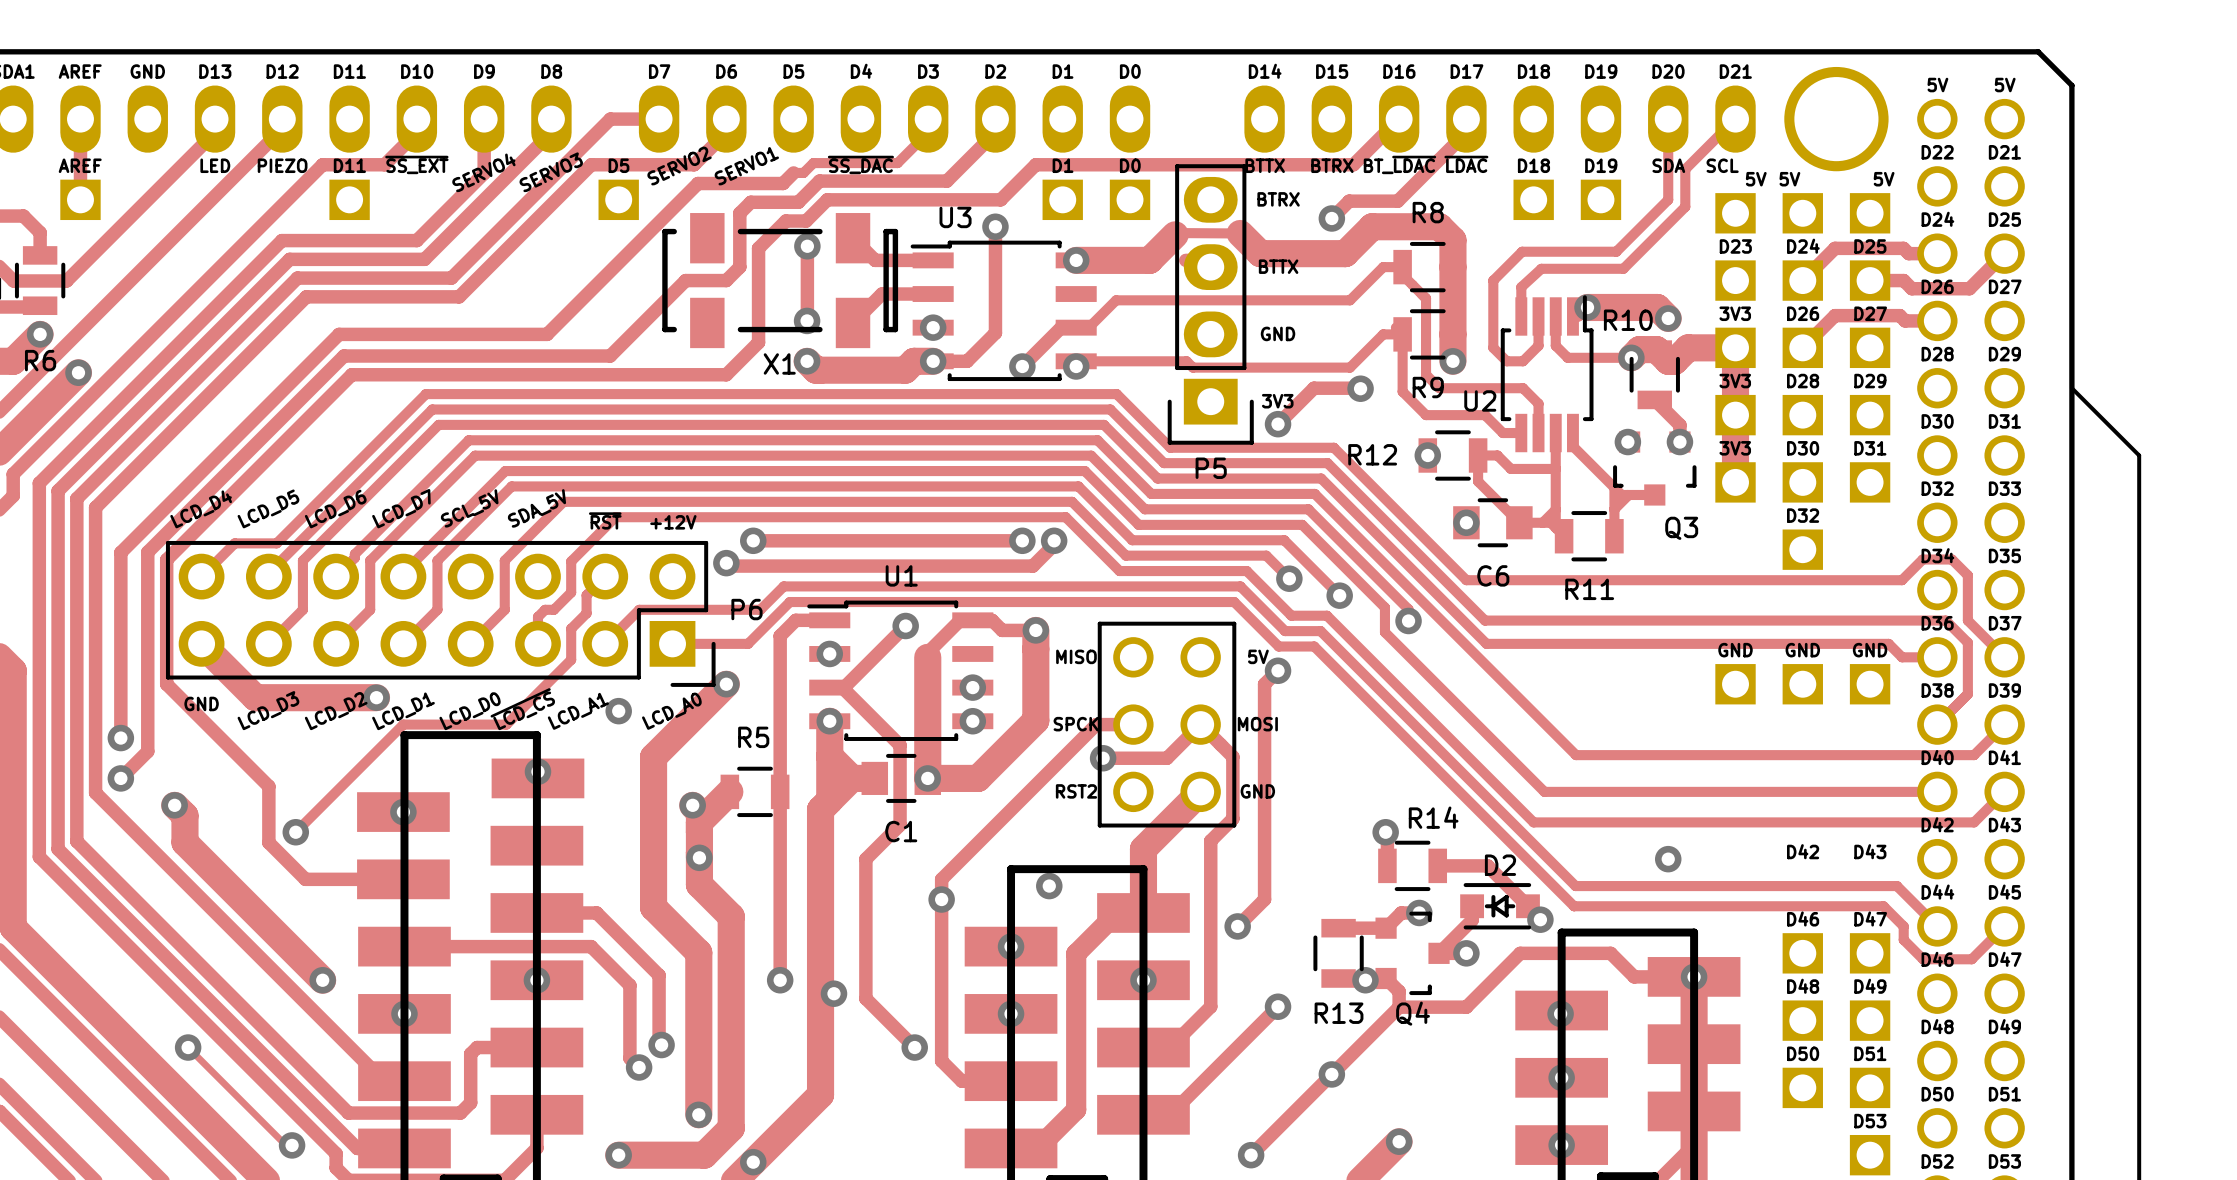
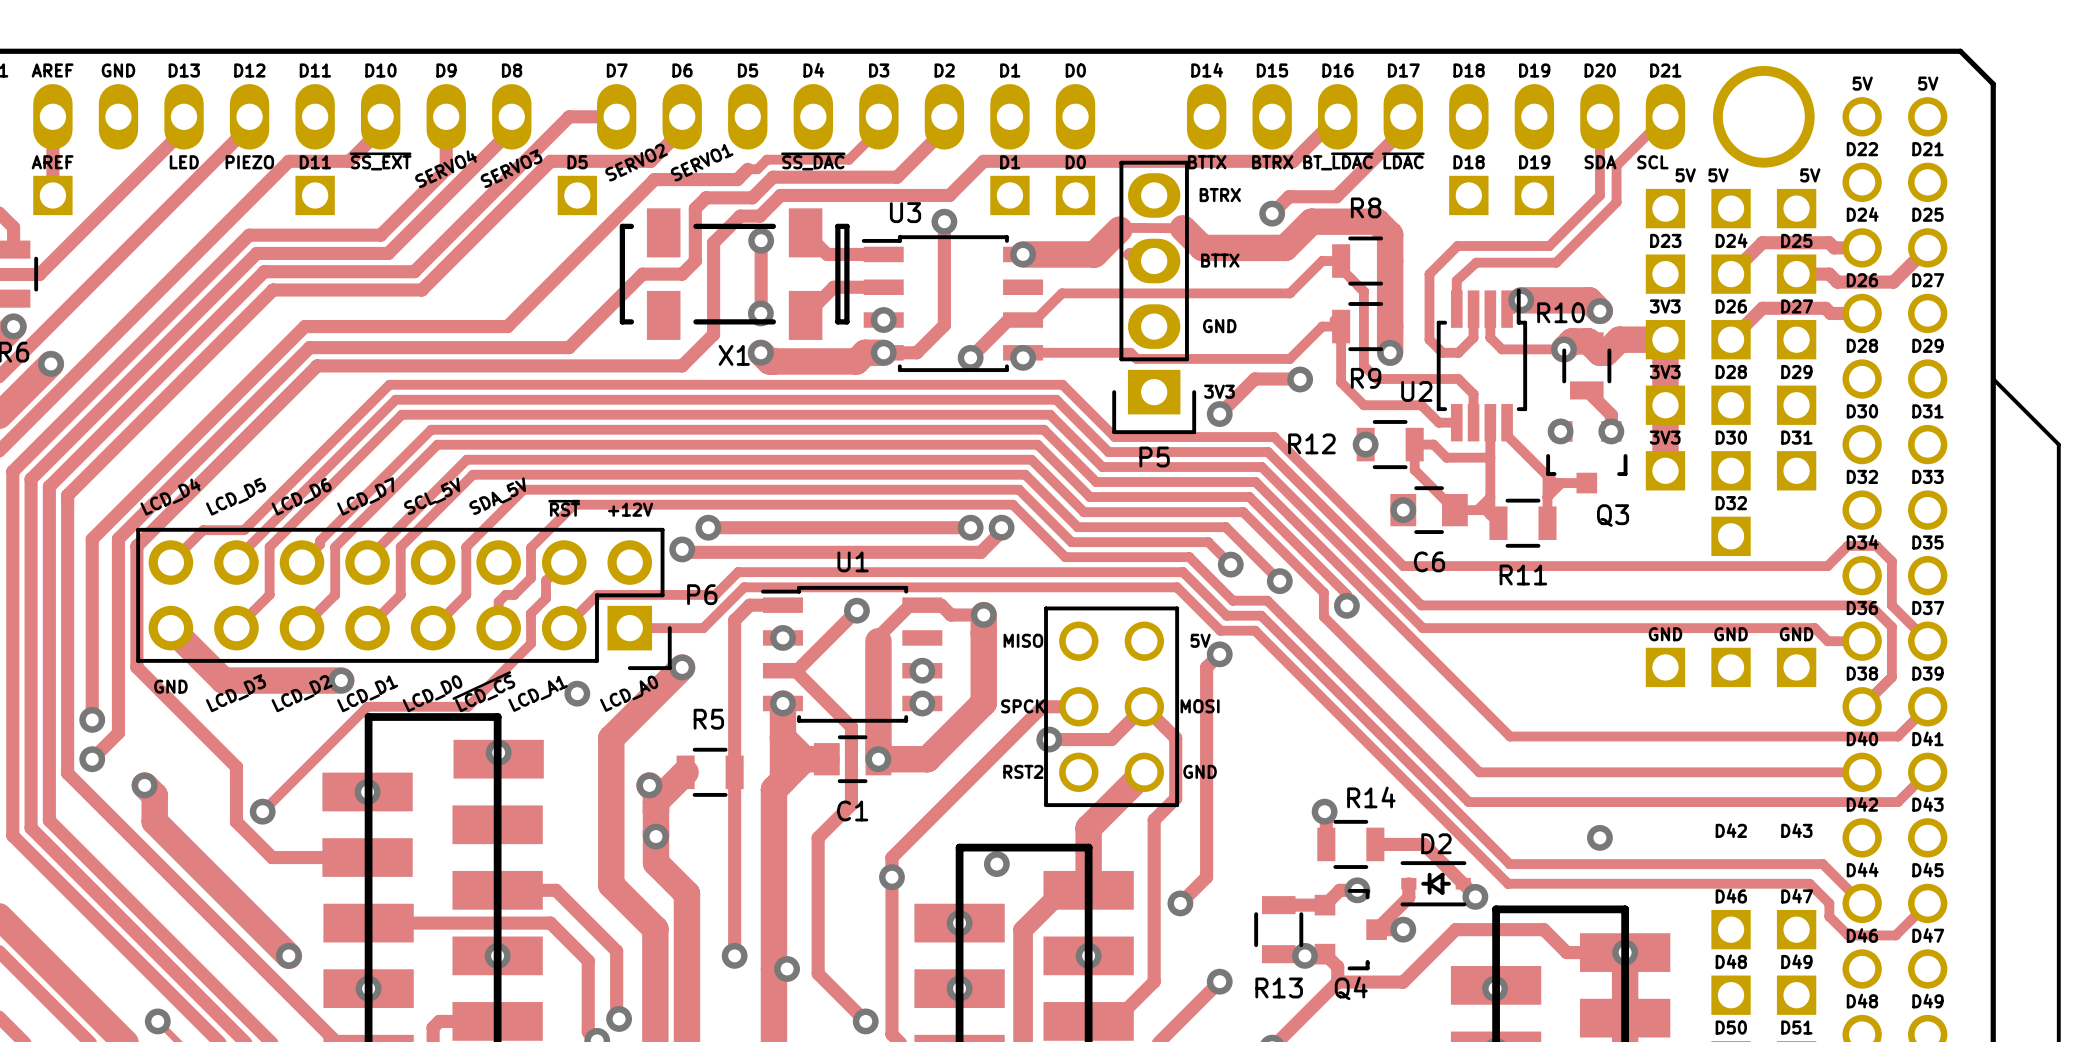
D2 footprint: [1460, 883, 1540, 930] -> [1400, 861, 1471, 907]

